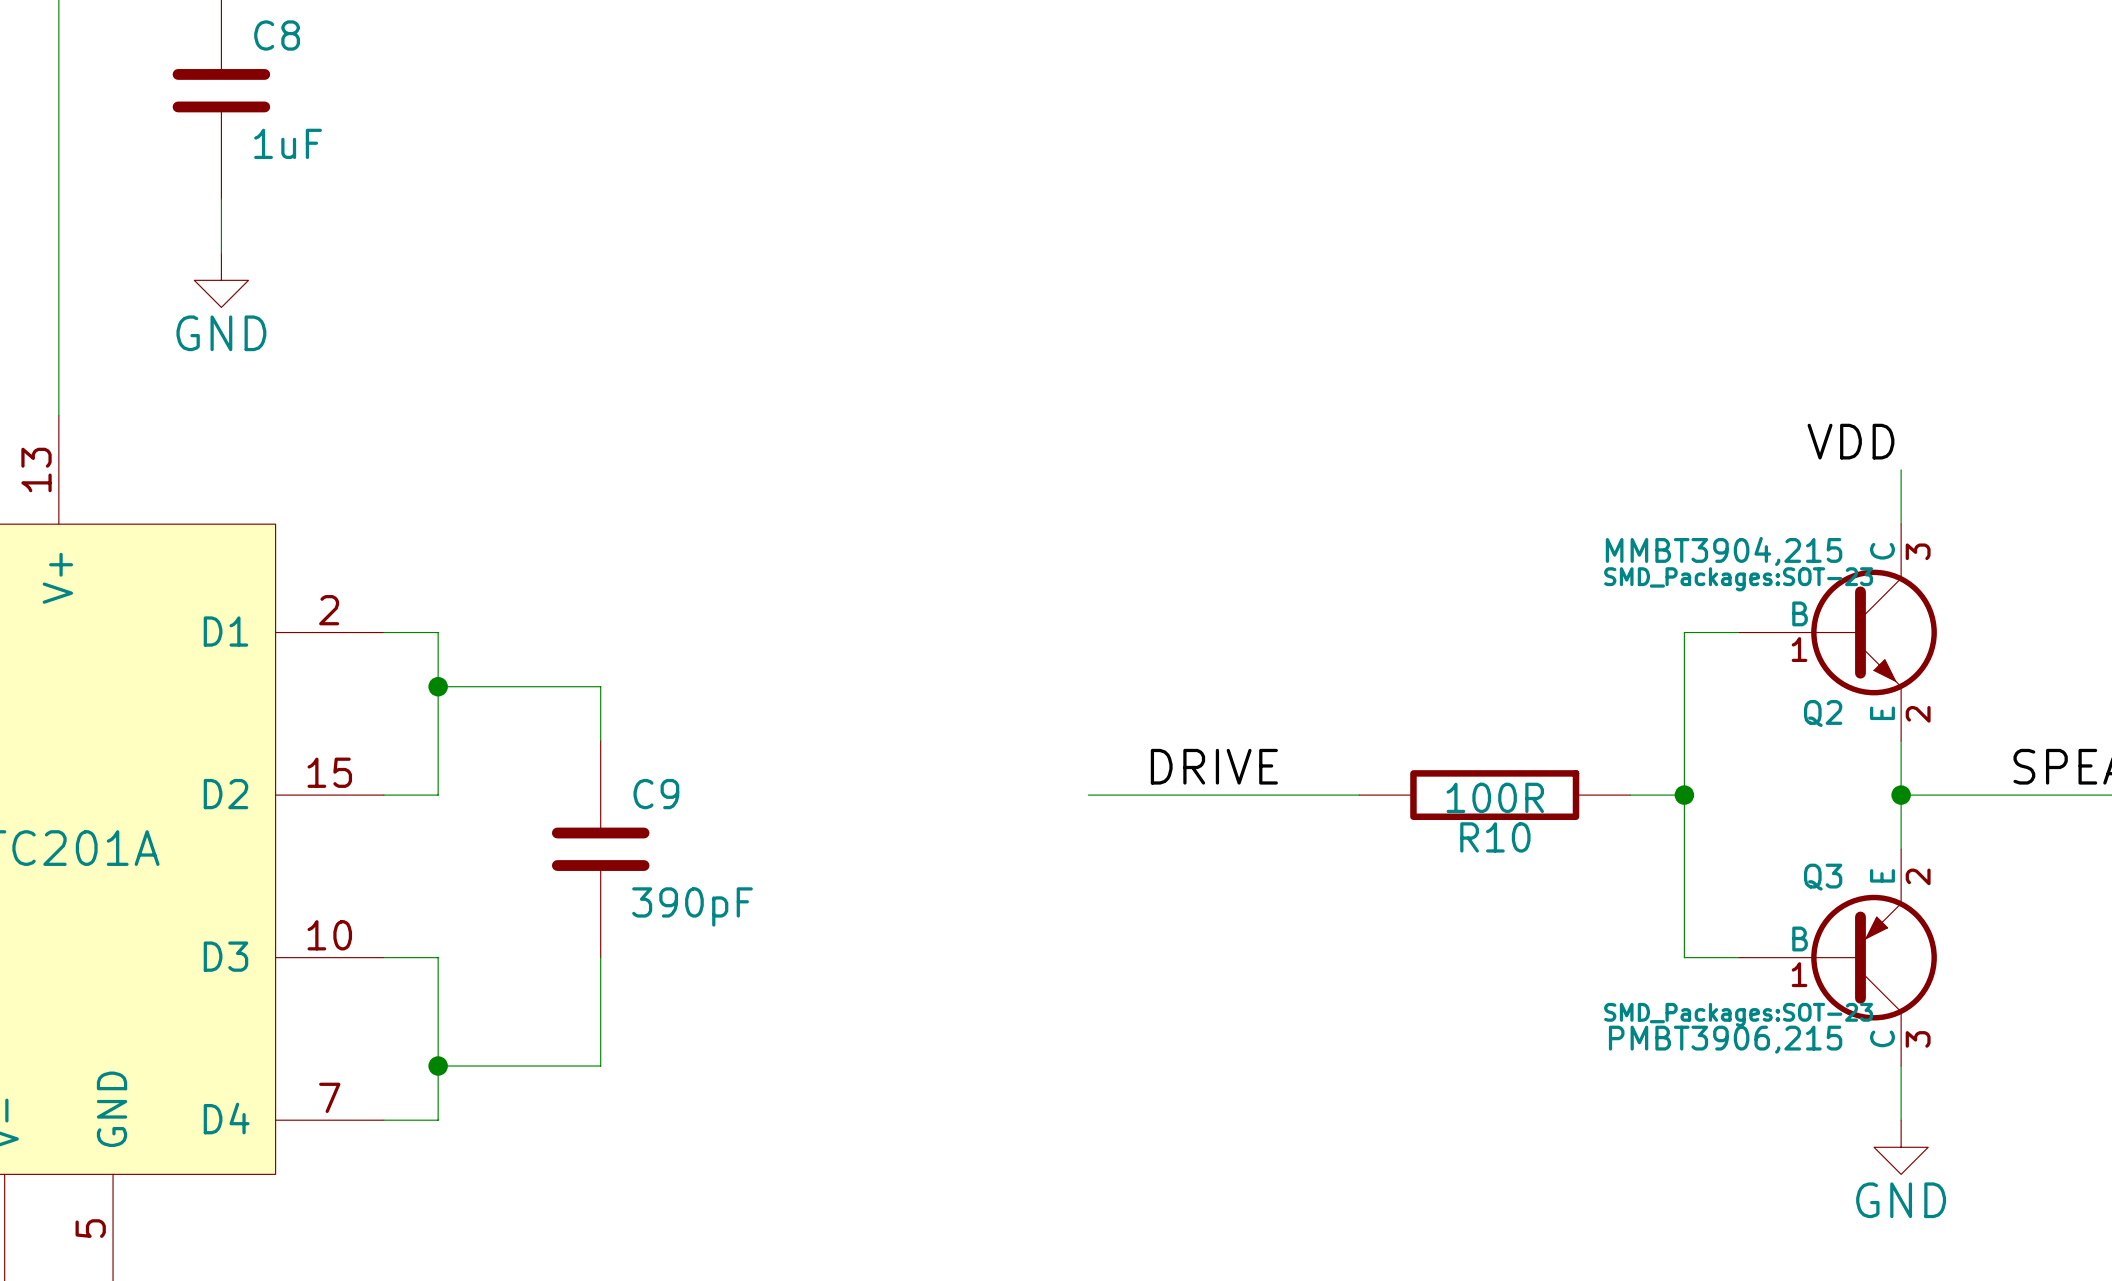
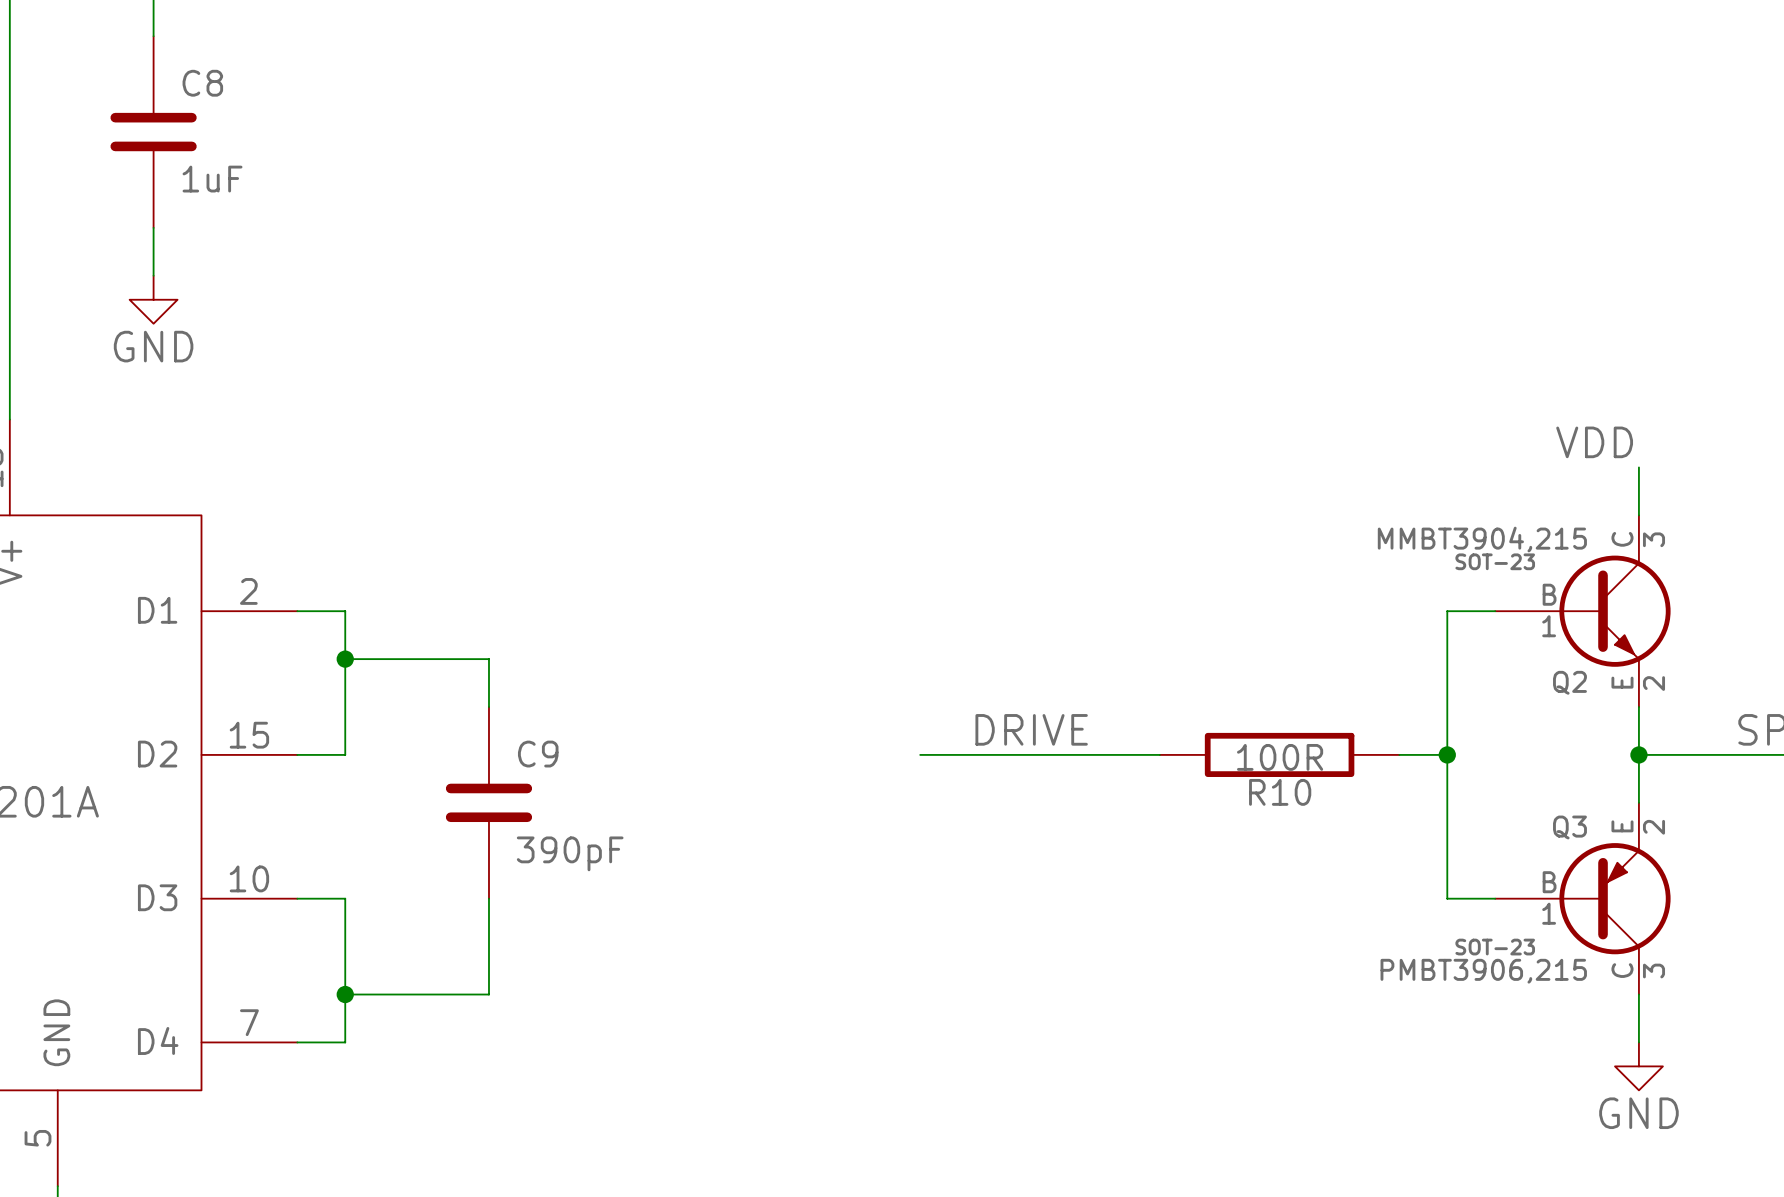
Q2 text: SMD_Packages:SOT-23 (1738, 579) -> SOT-23 (1495, 561)
Q3 text: SMD_Packages:SOT-23 (1738, 1014) -> SOT-23 (1495, 947)

